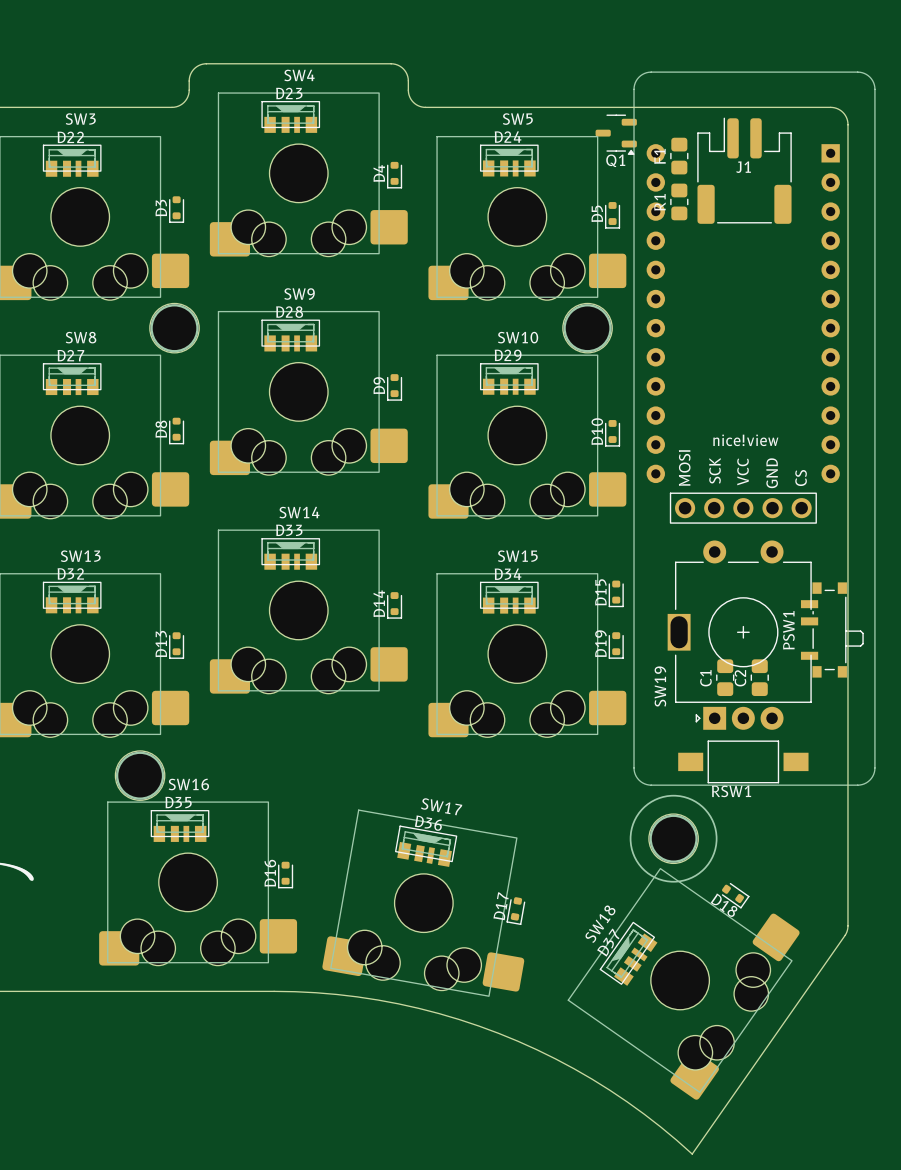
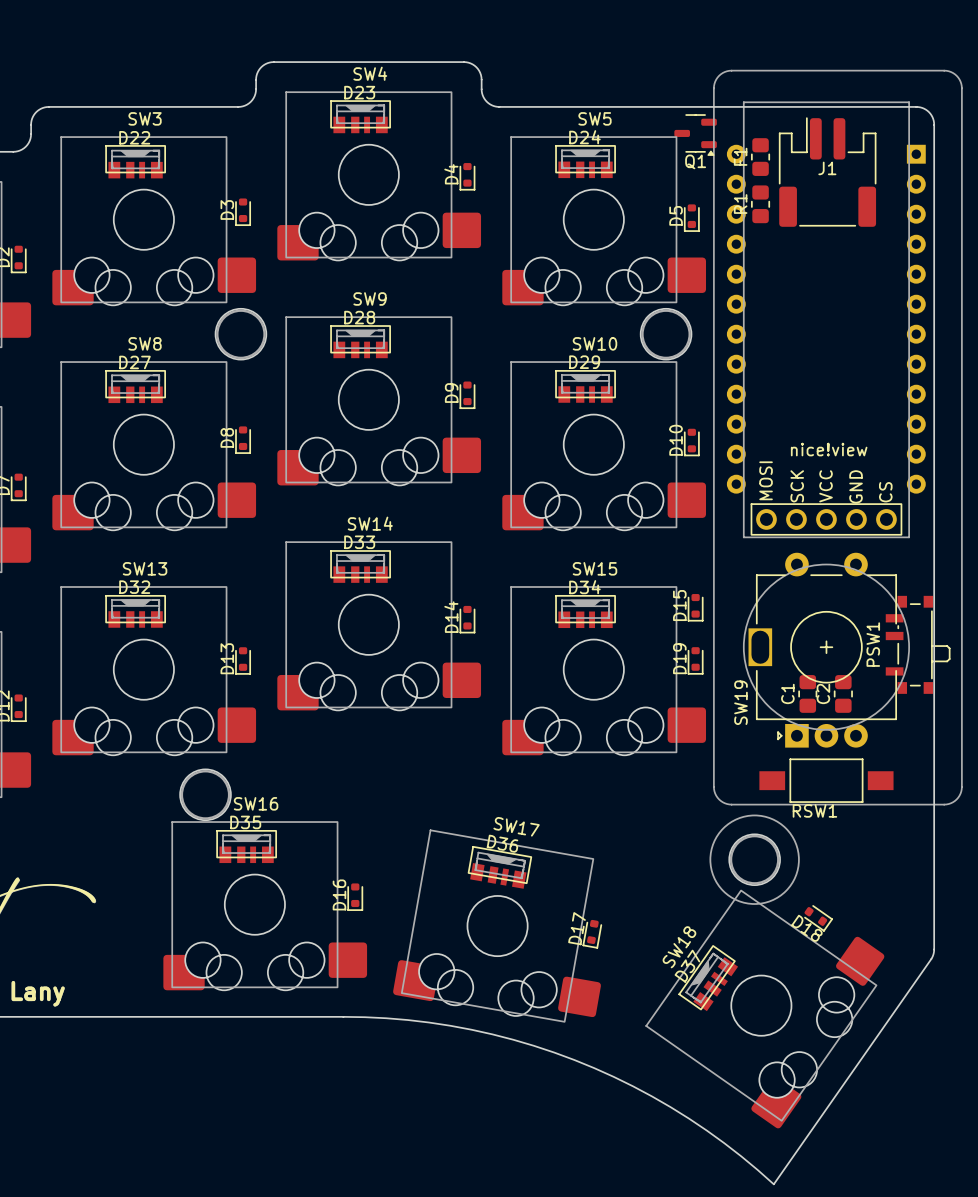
line: none -> (743, 102) (909, 102) (909, 537) (743, 537) (743, 102)
drawing: none -> [743, 563, 910, 731]

